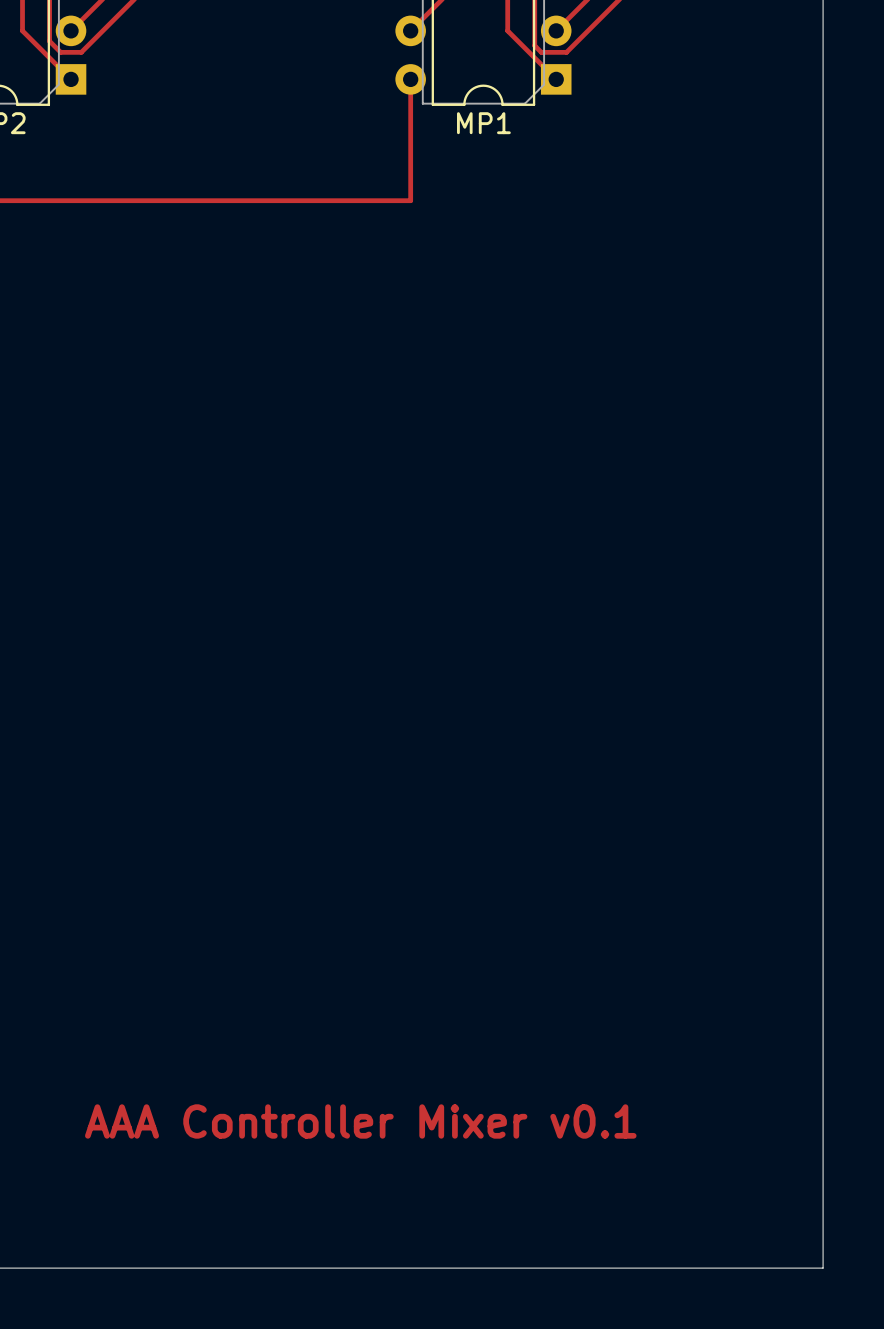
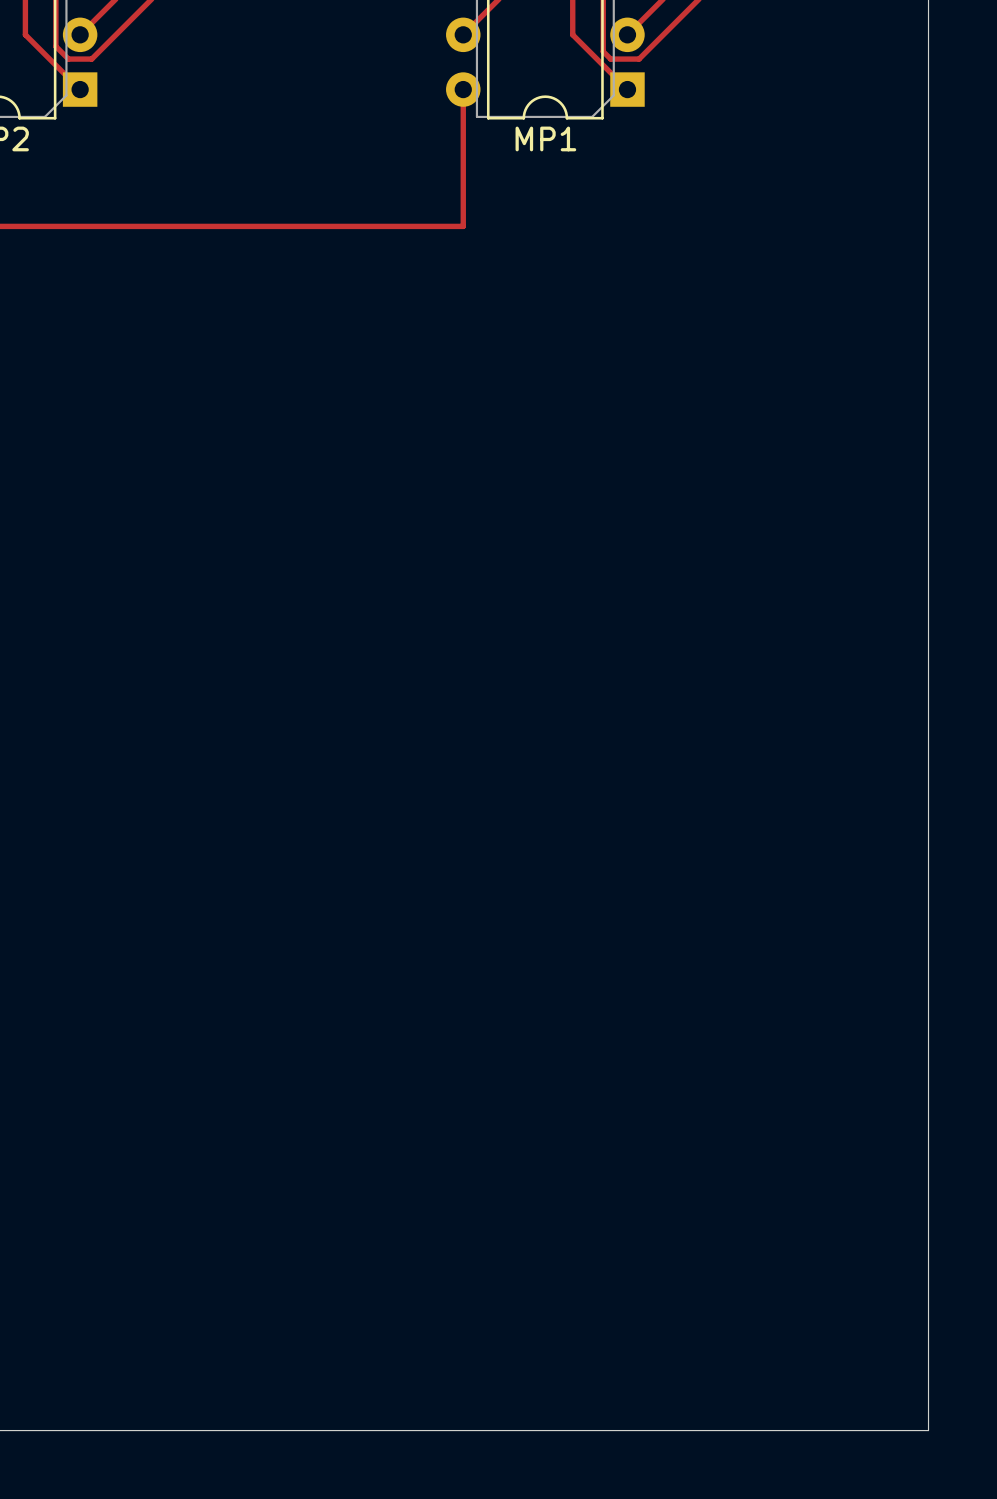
text: AAA Controller Mixer v0.1 (360, 1121) -> none

